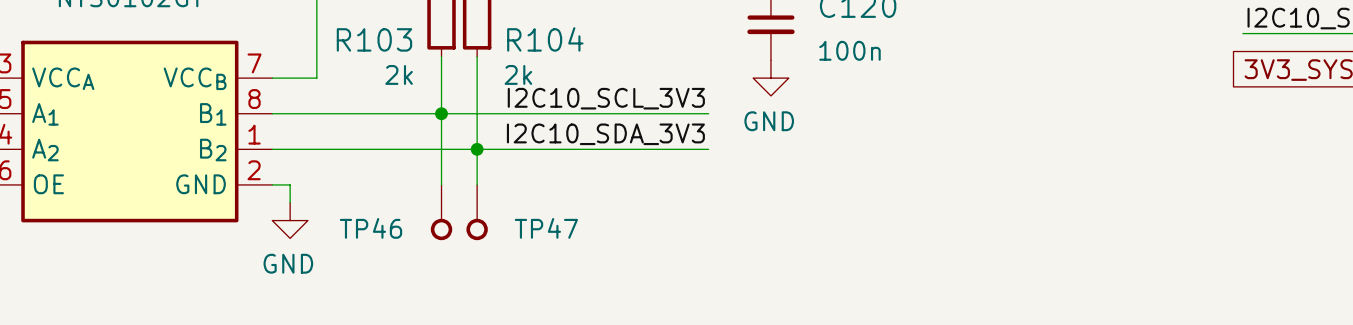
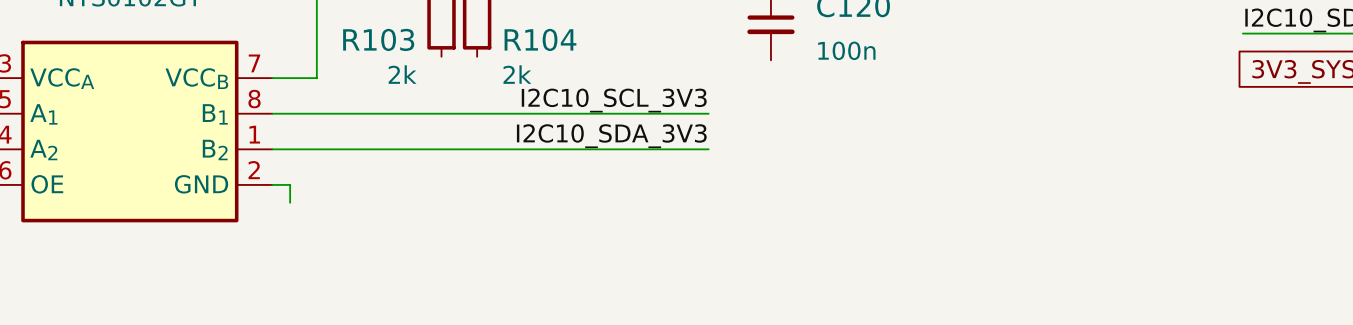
wire: (441, 56) (441, 184) -> none
wire: (477, 56) (477, 184) -> none
power symbol: GND (770, 78) -> none
junction: (441, 113) -> none
junction: (477, 149) -> none
TP46: (441, 212) -> none
TP47: (477, 212) -> none
power symbol: GND (290, 220) -> none

